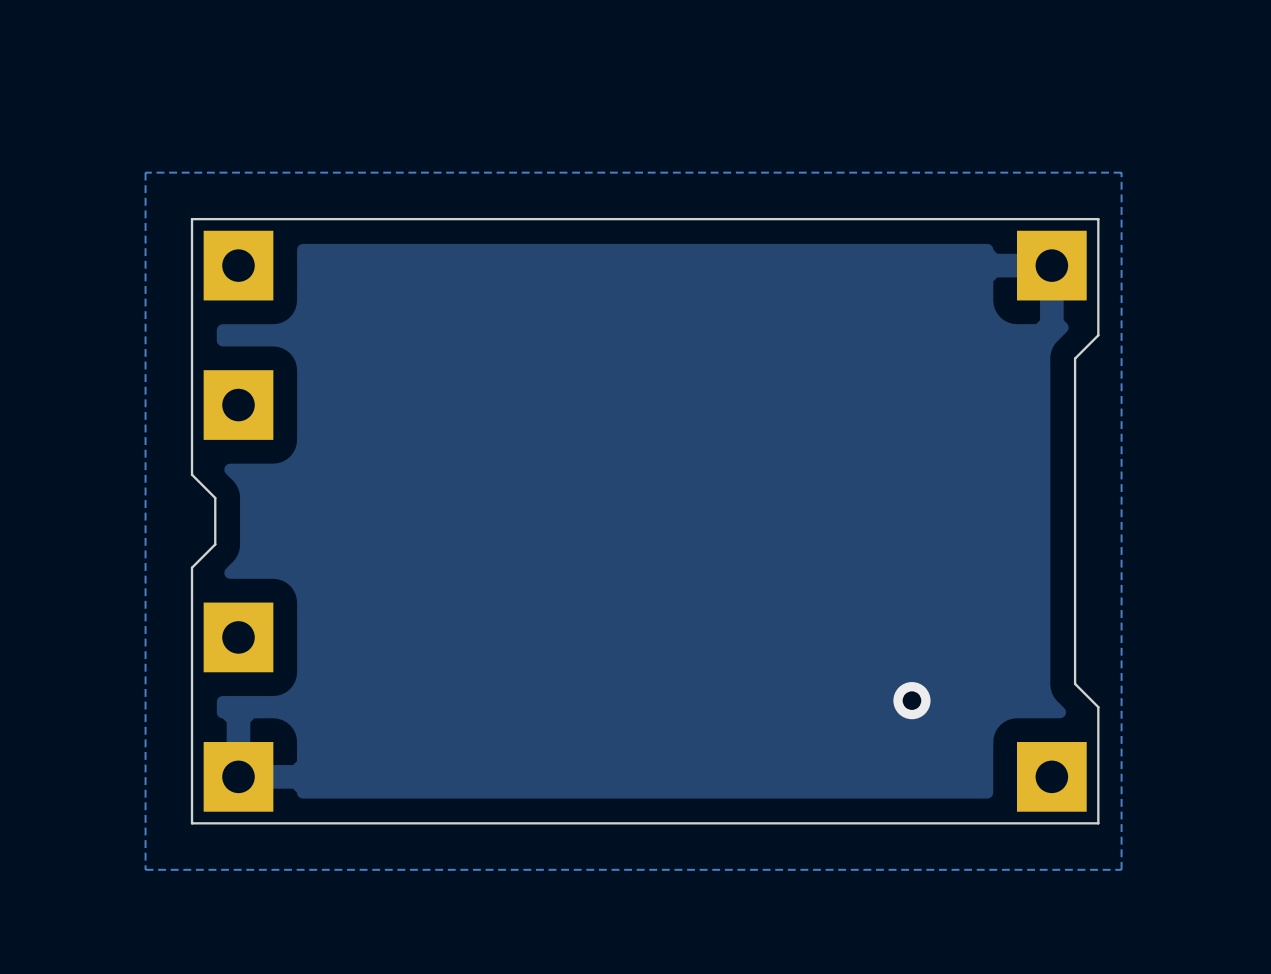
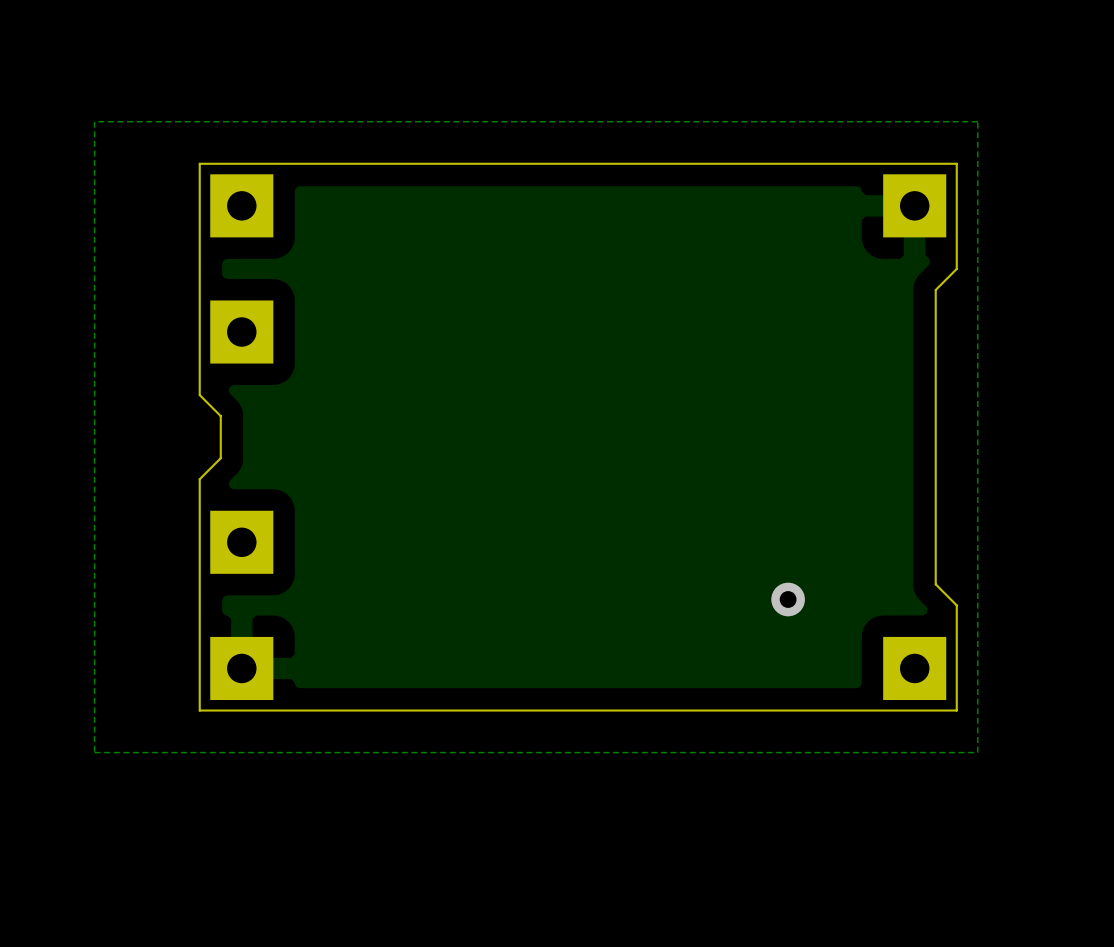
board edge: (261, 219) (192, 219) (192, 474) (215, 497) (215, 544) (192, 567) (192, 823) (261, 823) -> (199, 163) (199, 395) (220, 416) (220, 458) (199, 479) (199, 710)
part position: (238, 265) -> (241, 205)
part position: (238, 405) -> (241, 332)
part position: (238, 637) -> (241, 542)
part position: (238, 776) -> (241, 668)

